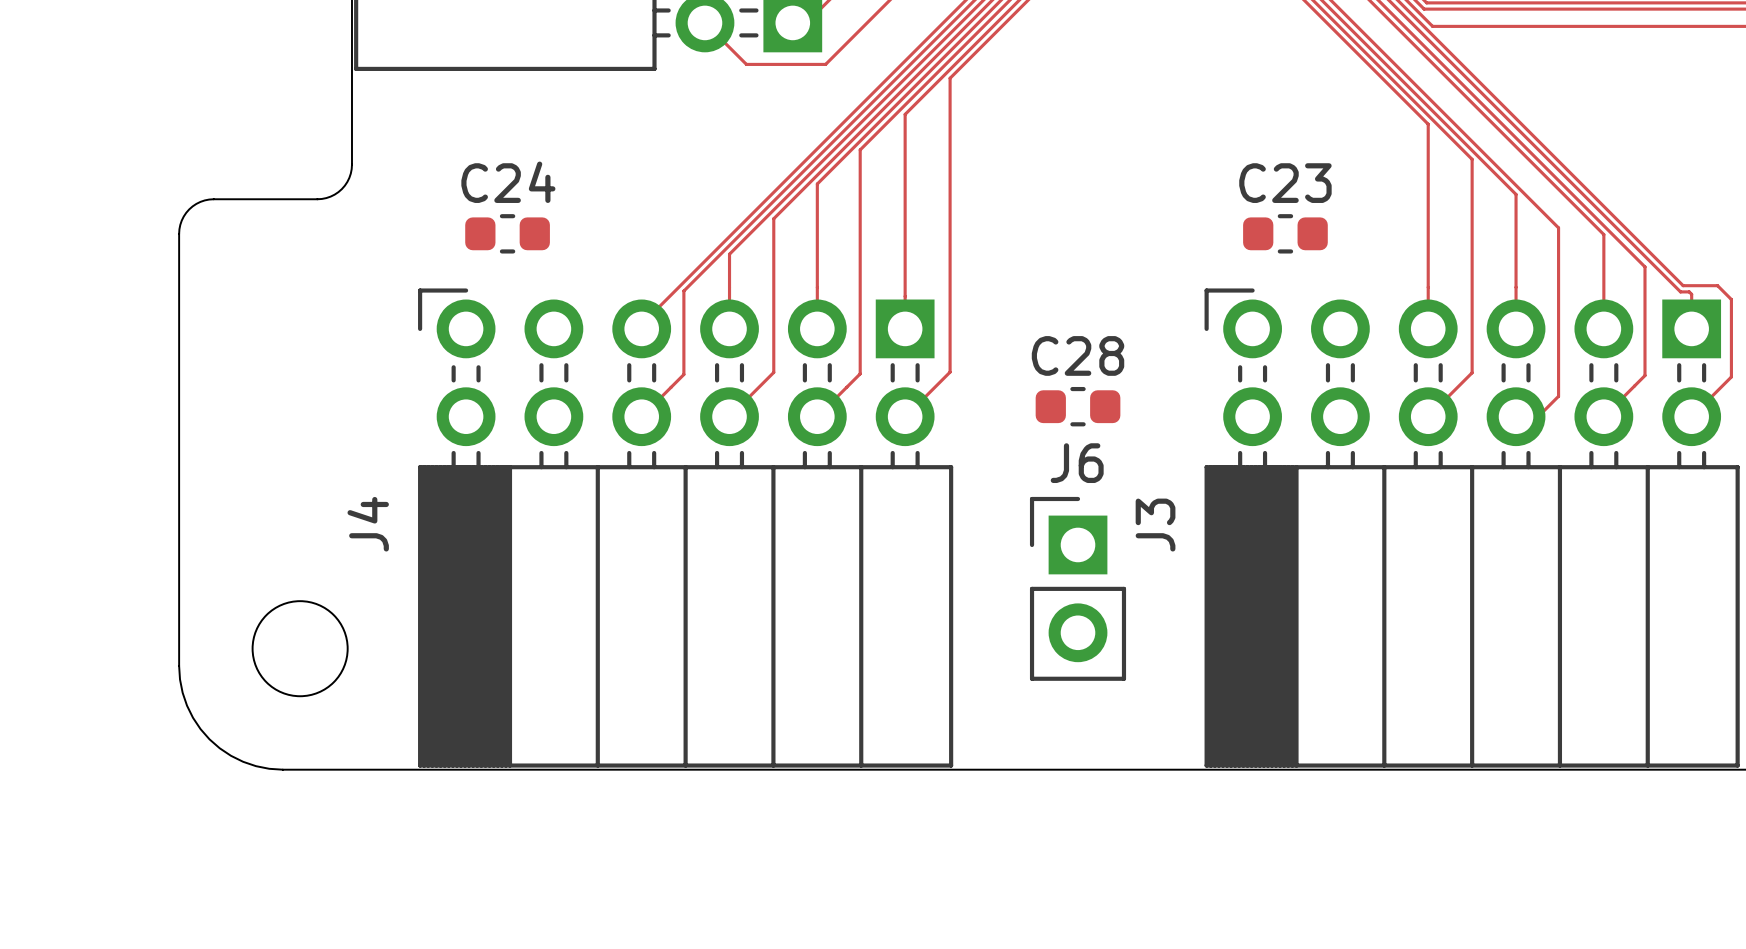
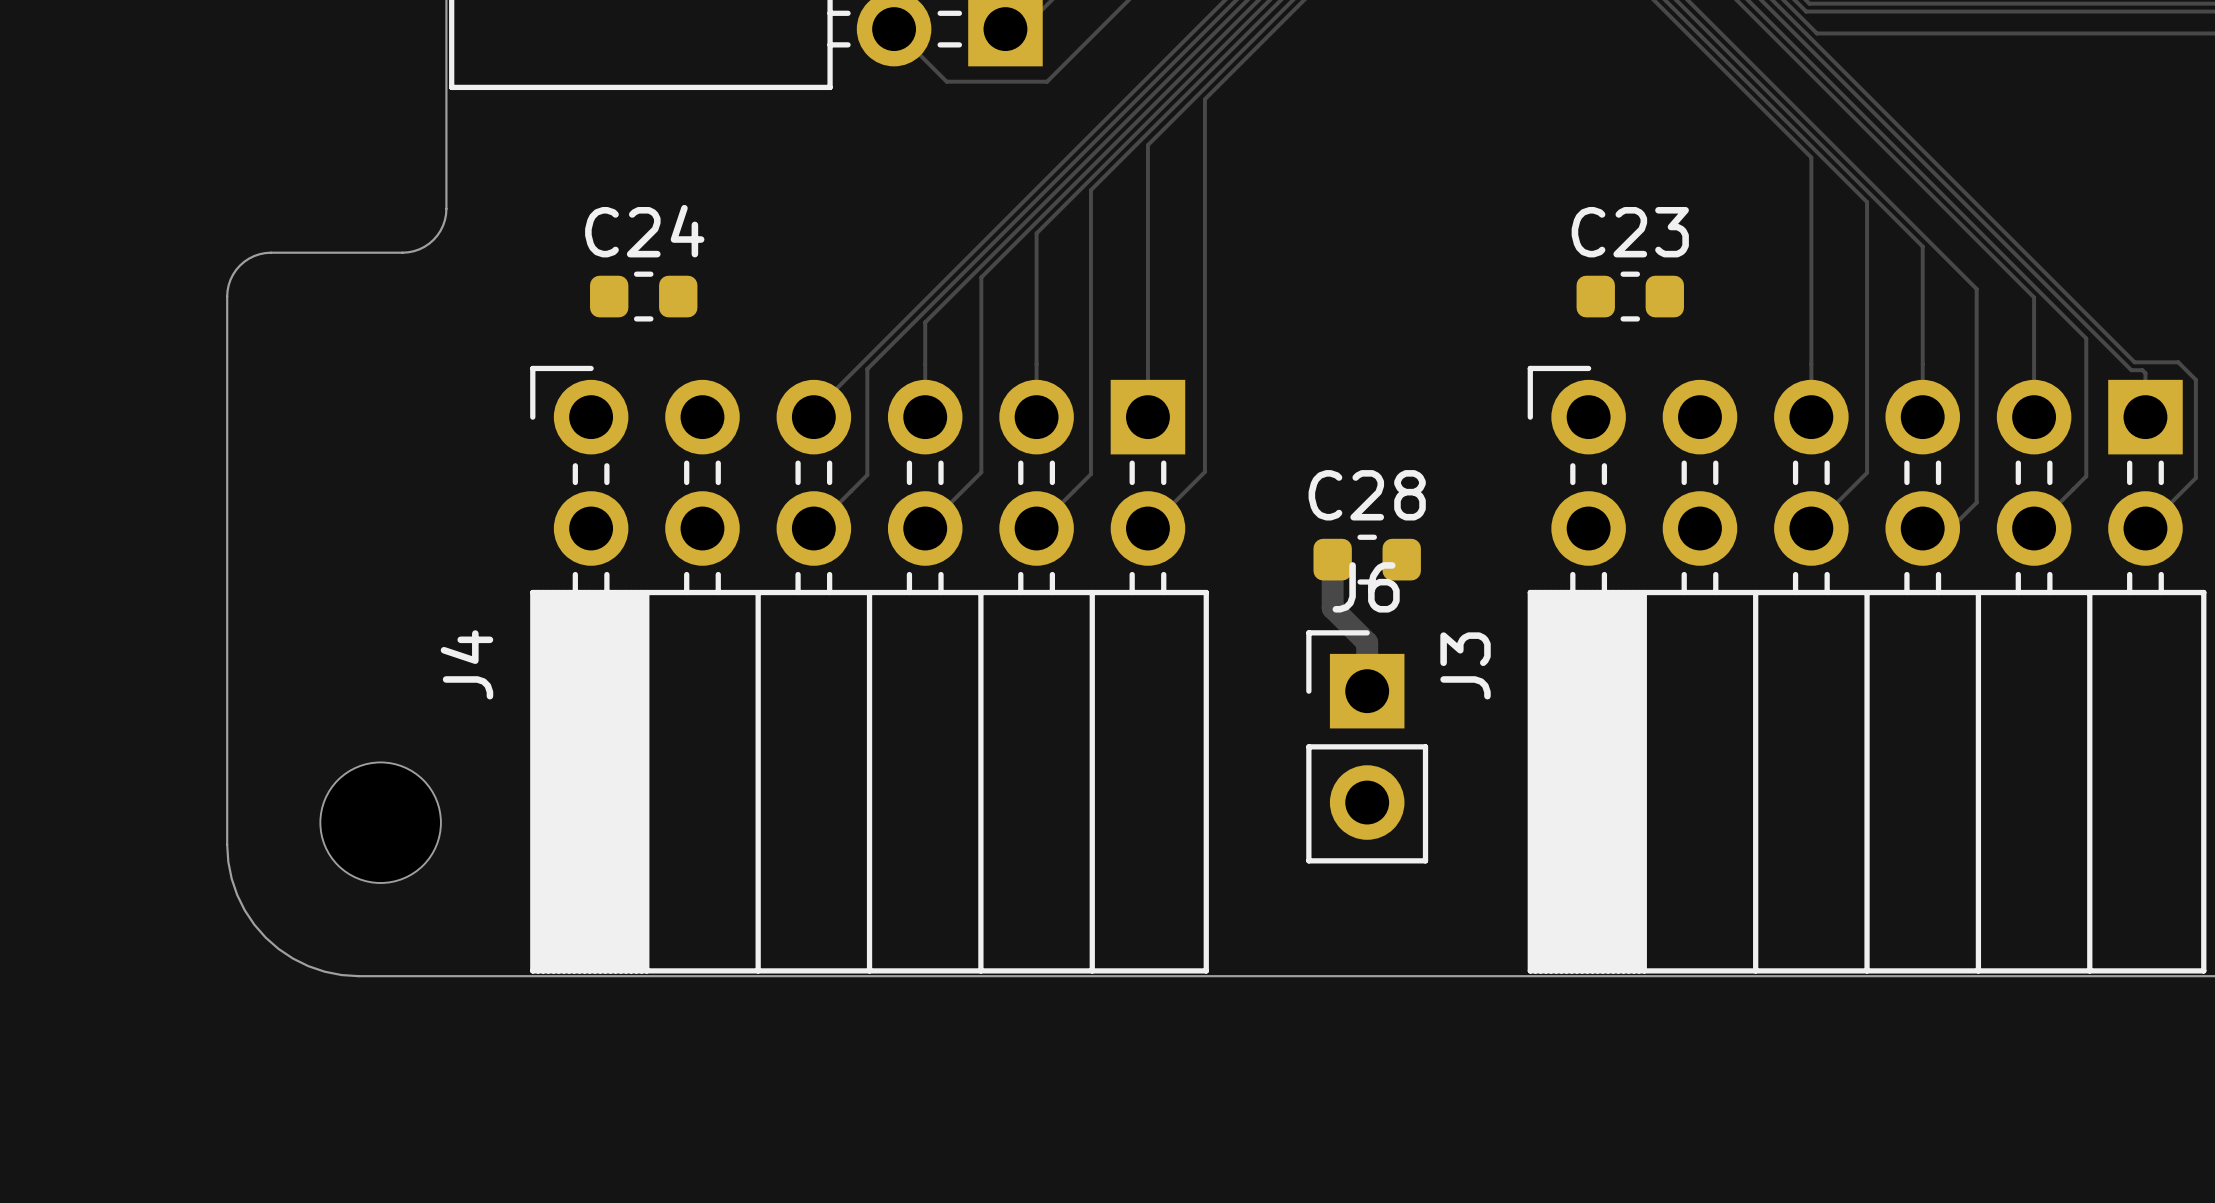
C28 position: (1078, 406) -> (1367, 559)
track: none -> (1332, 559) (1332, 608) (1367, 642) (1367, 691)

